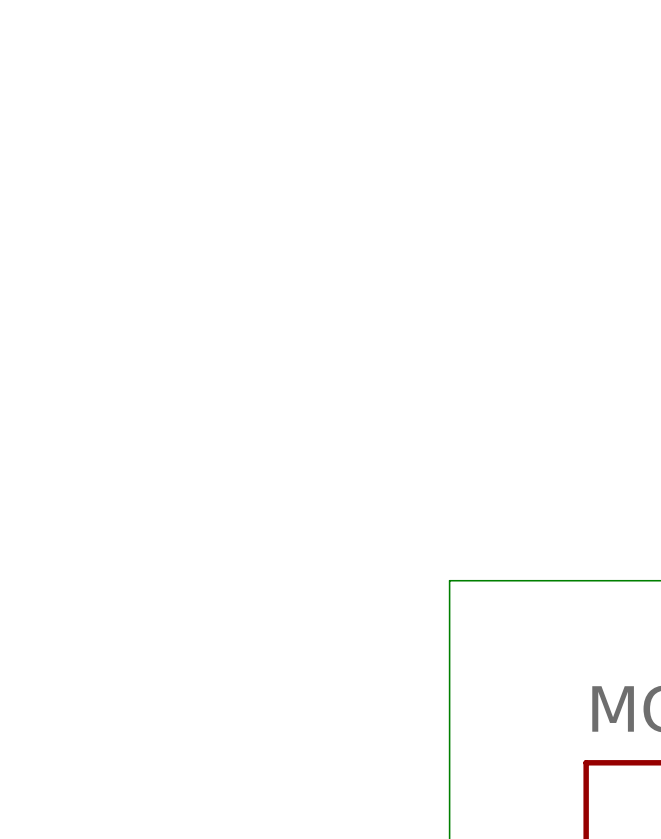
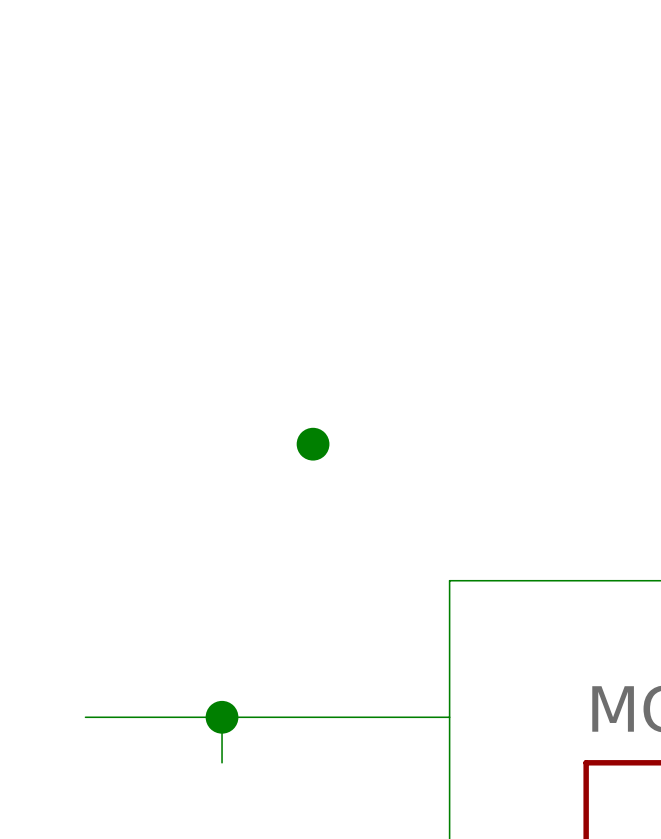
junction: none -> (313, 444)
wire: none -> (85, 717) (449, 717)
wire: none -> (222, 717) (222, 762)
junction: none -> (222, 717)

